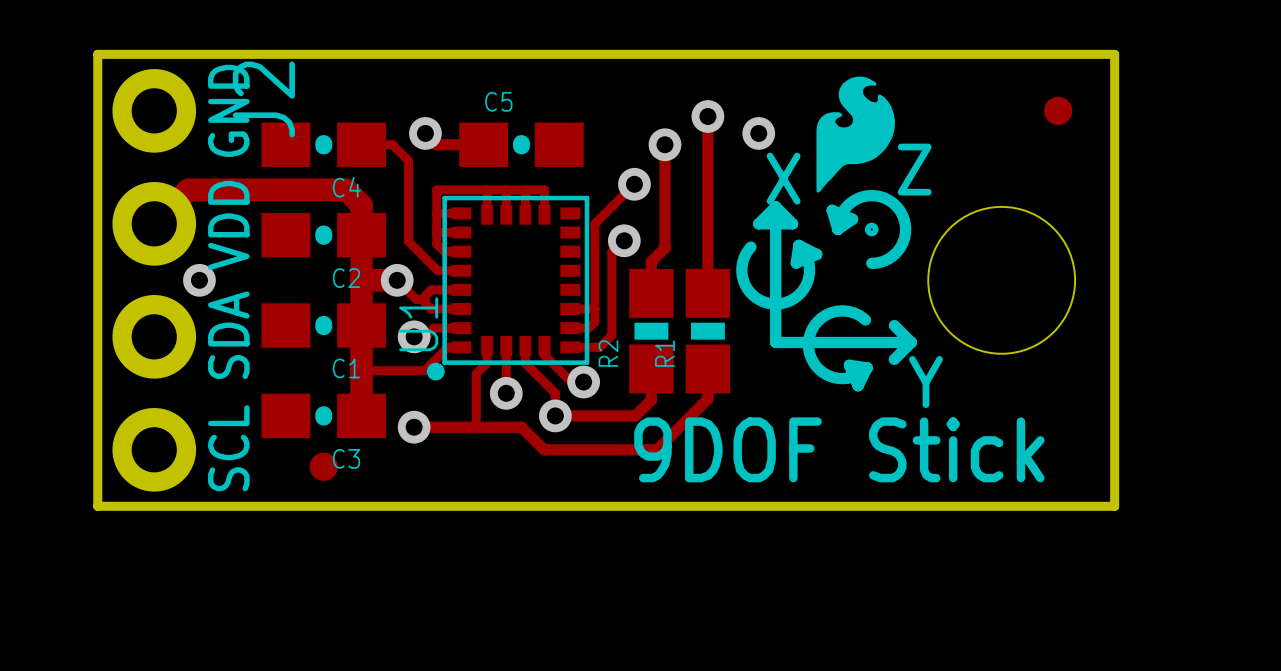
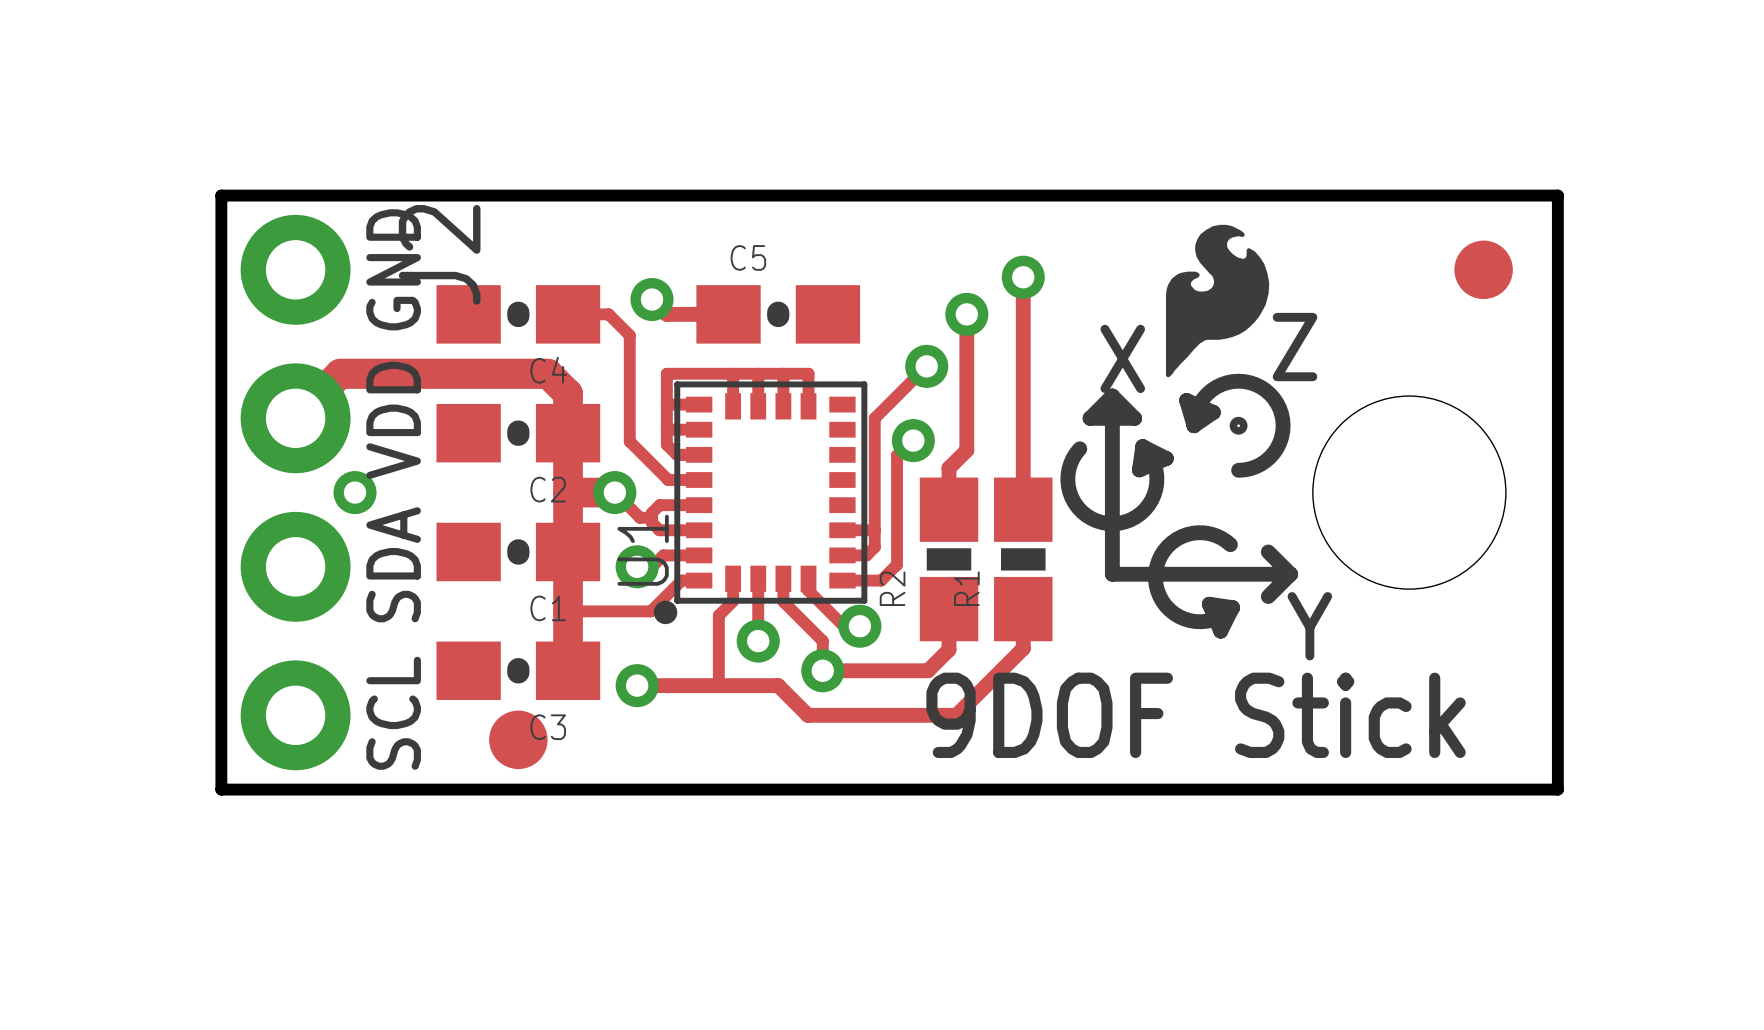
part footprint: [1044, 96, 1073, 125] -> [1454, 240, 1513, 300]
via: (758, 133) -> none
part footprint: [309, 452, 338, 481] -> [489, 710, 548, 770]

